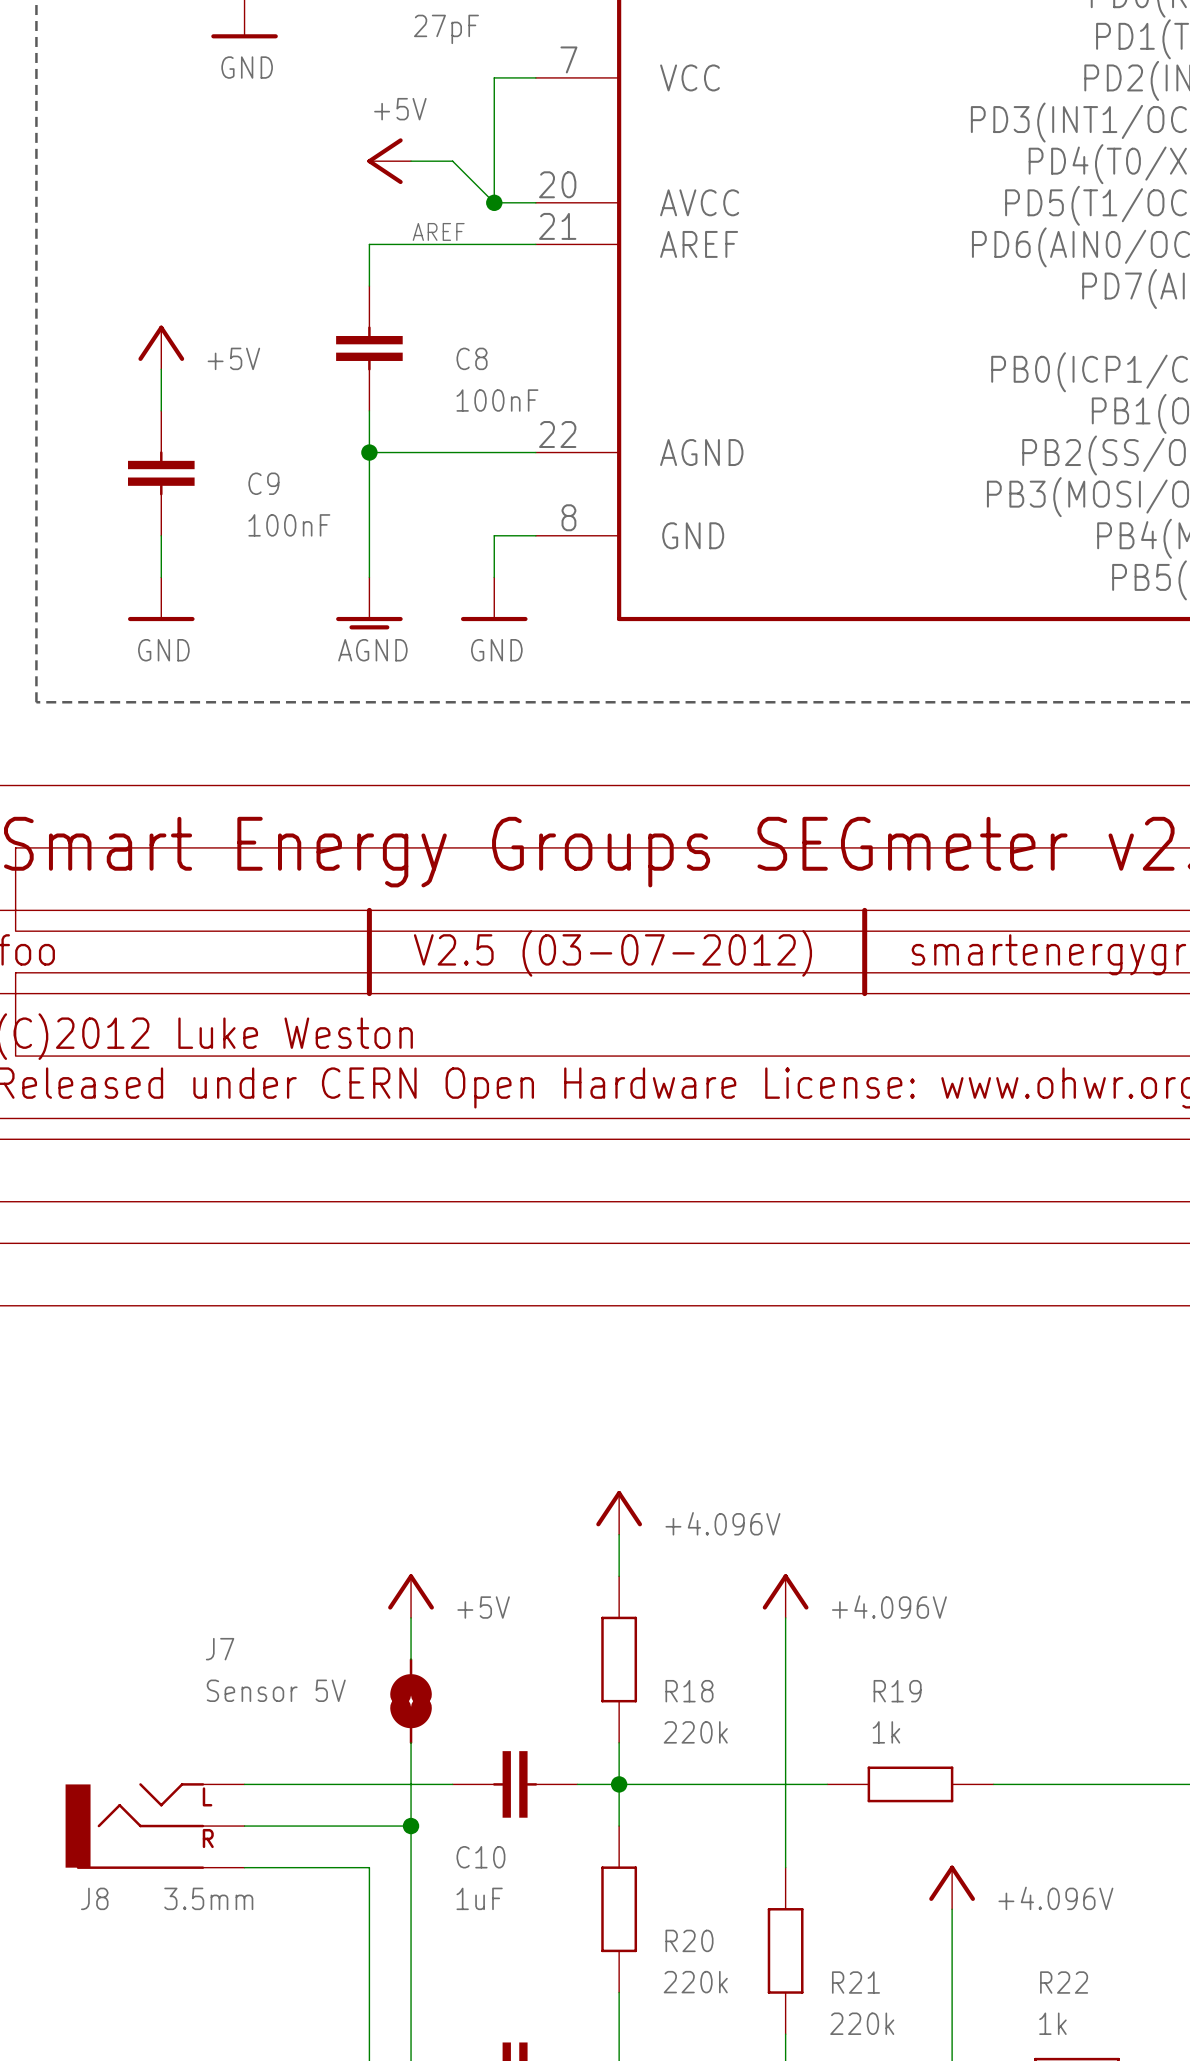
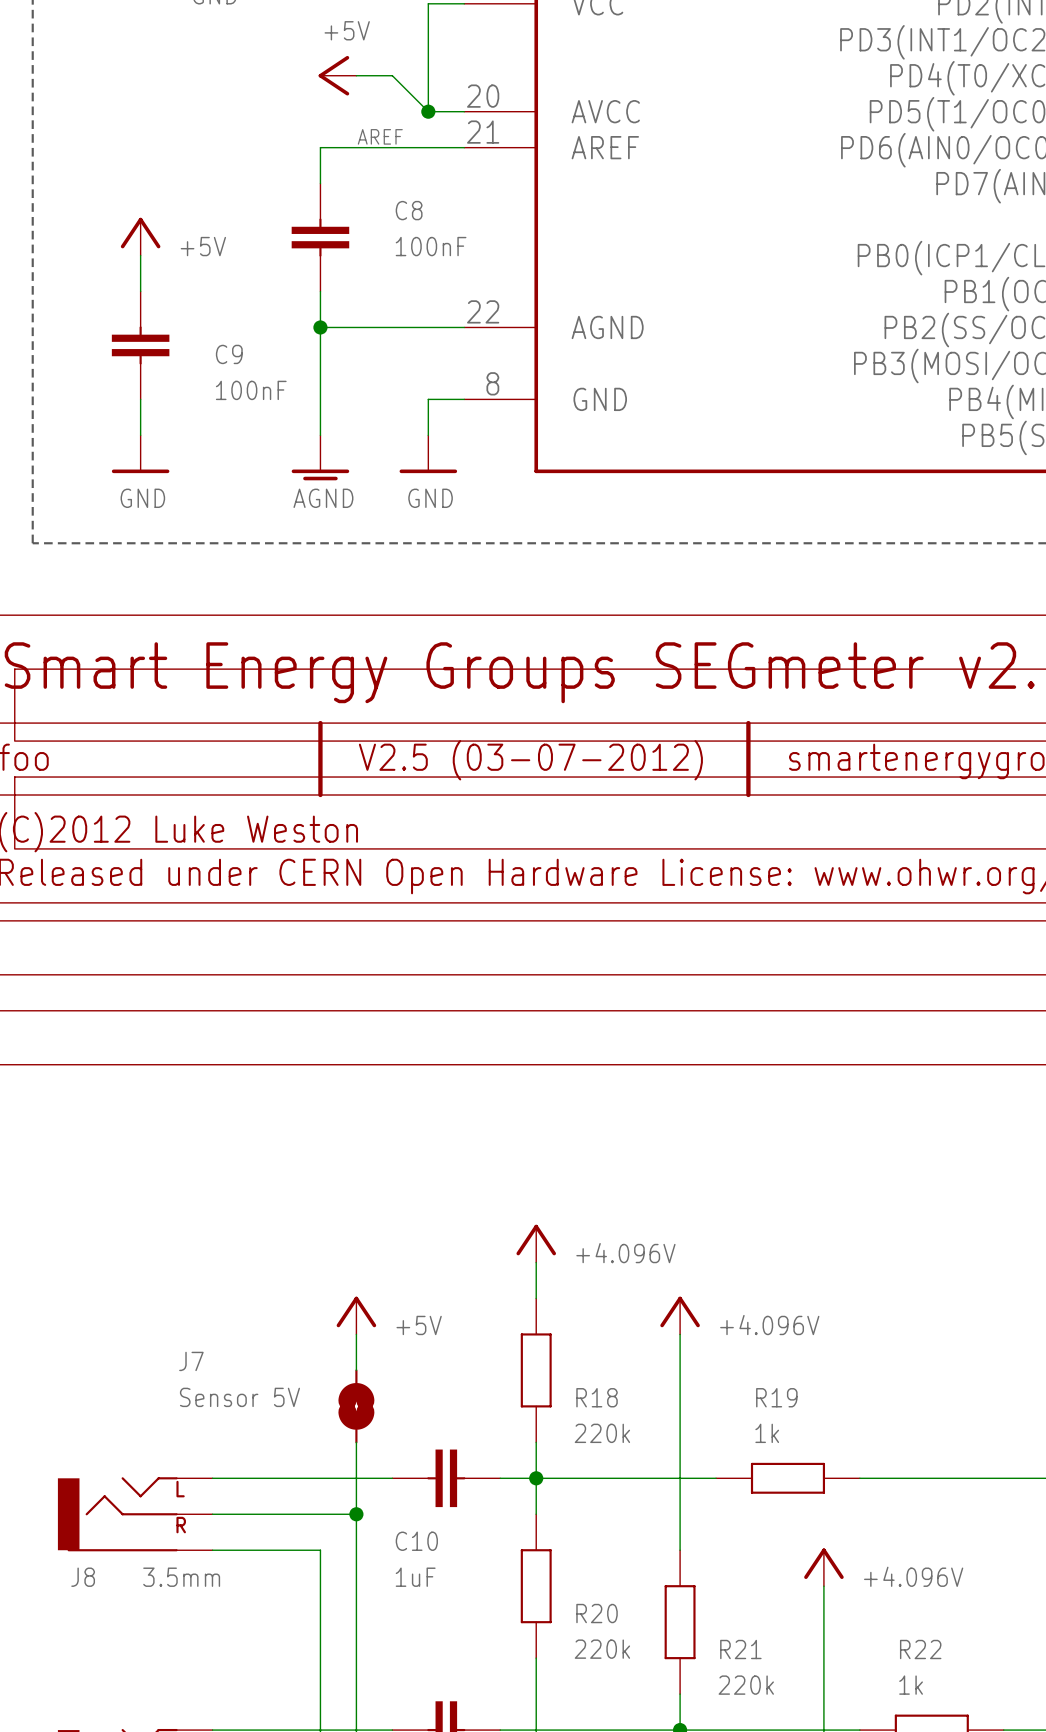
C8 name position: C8 (472, 358) -> C8 (409, 210)
C8 value position: 100nF (497, 400) -> 100nF (431, 246)

